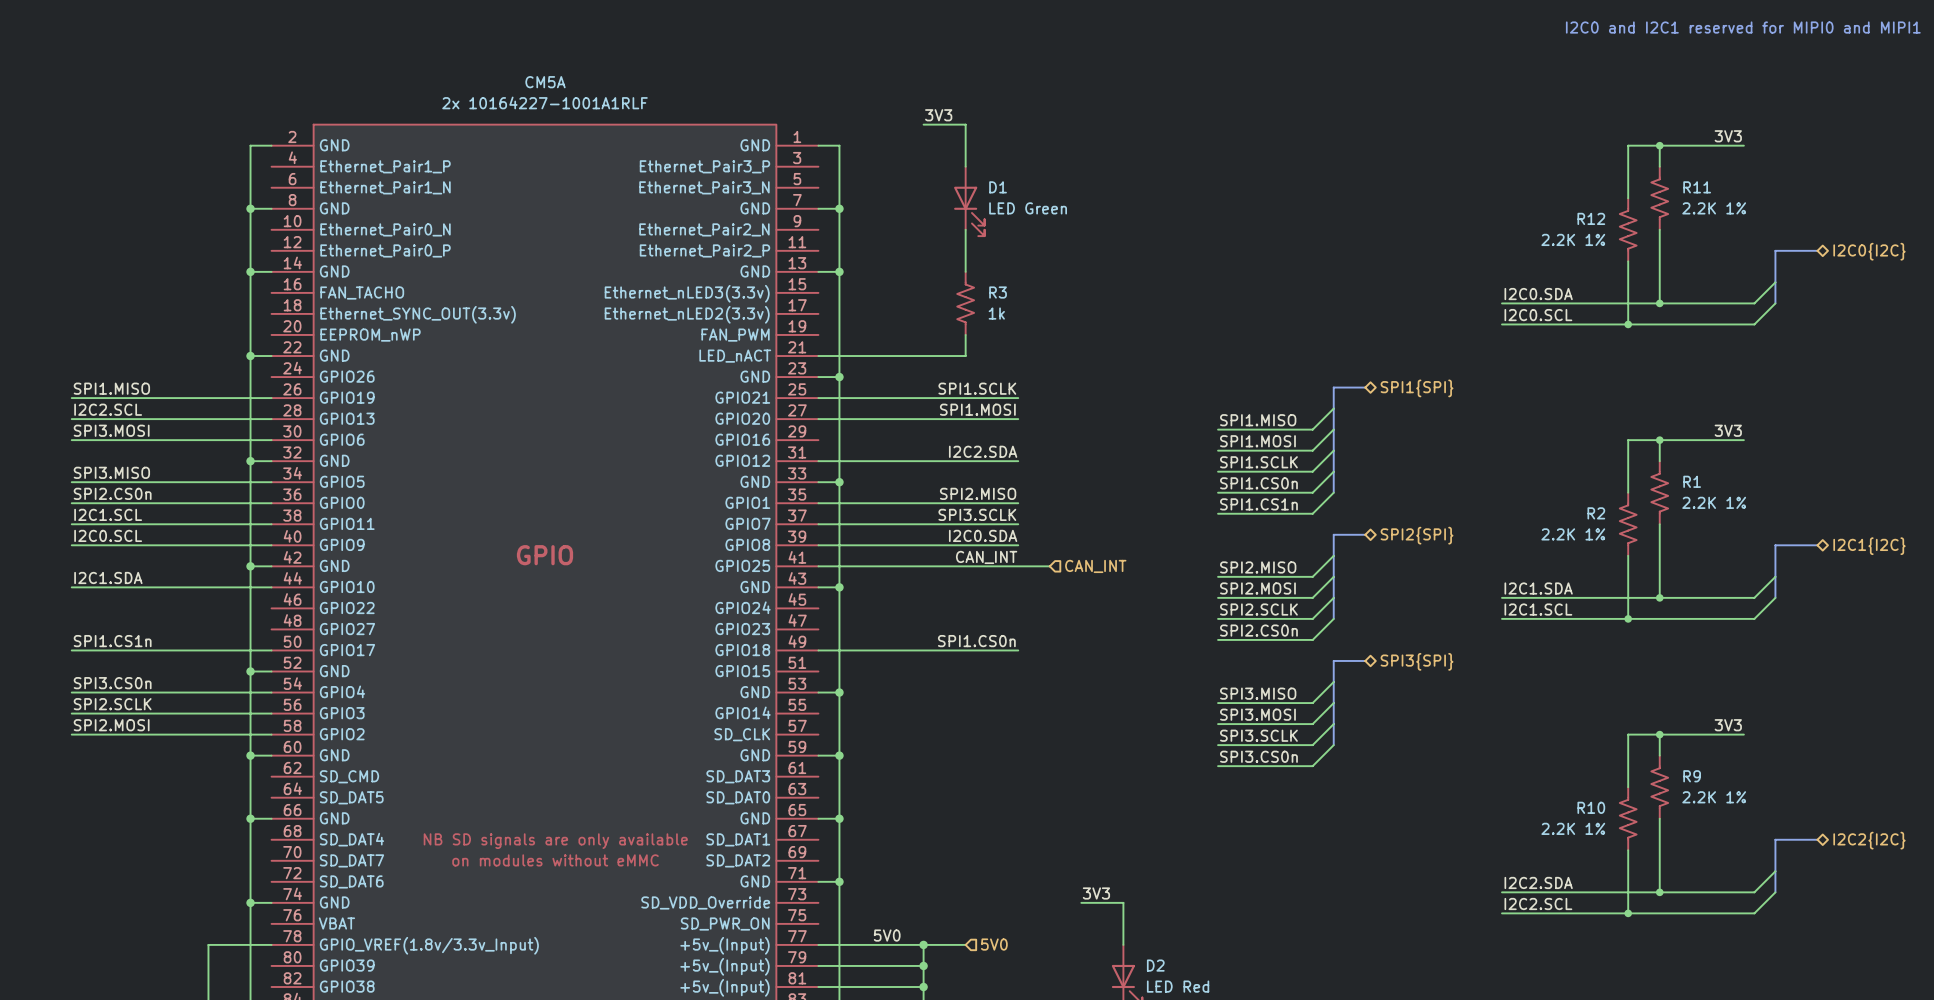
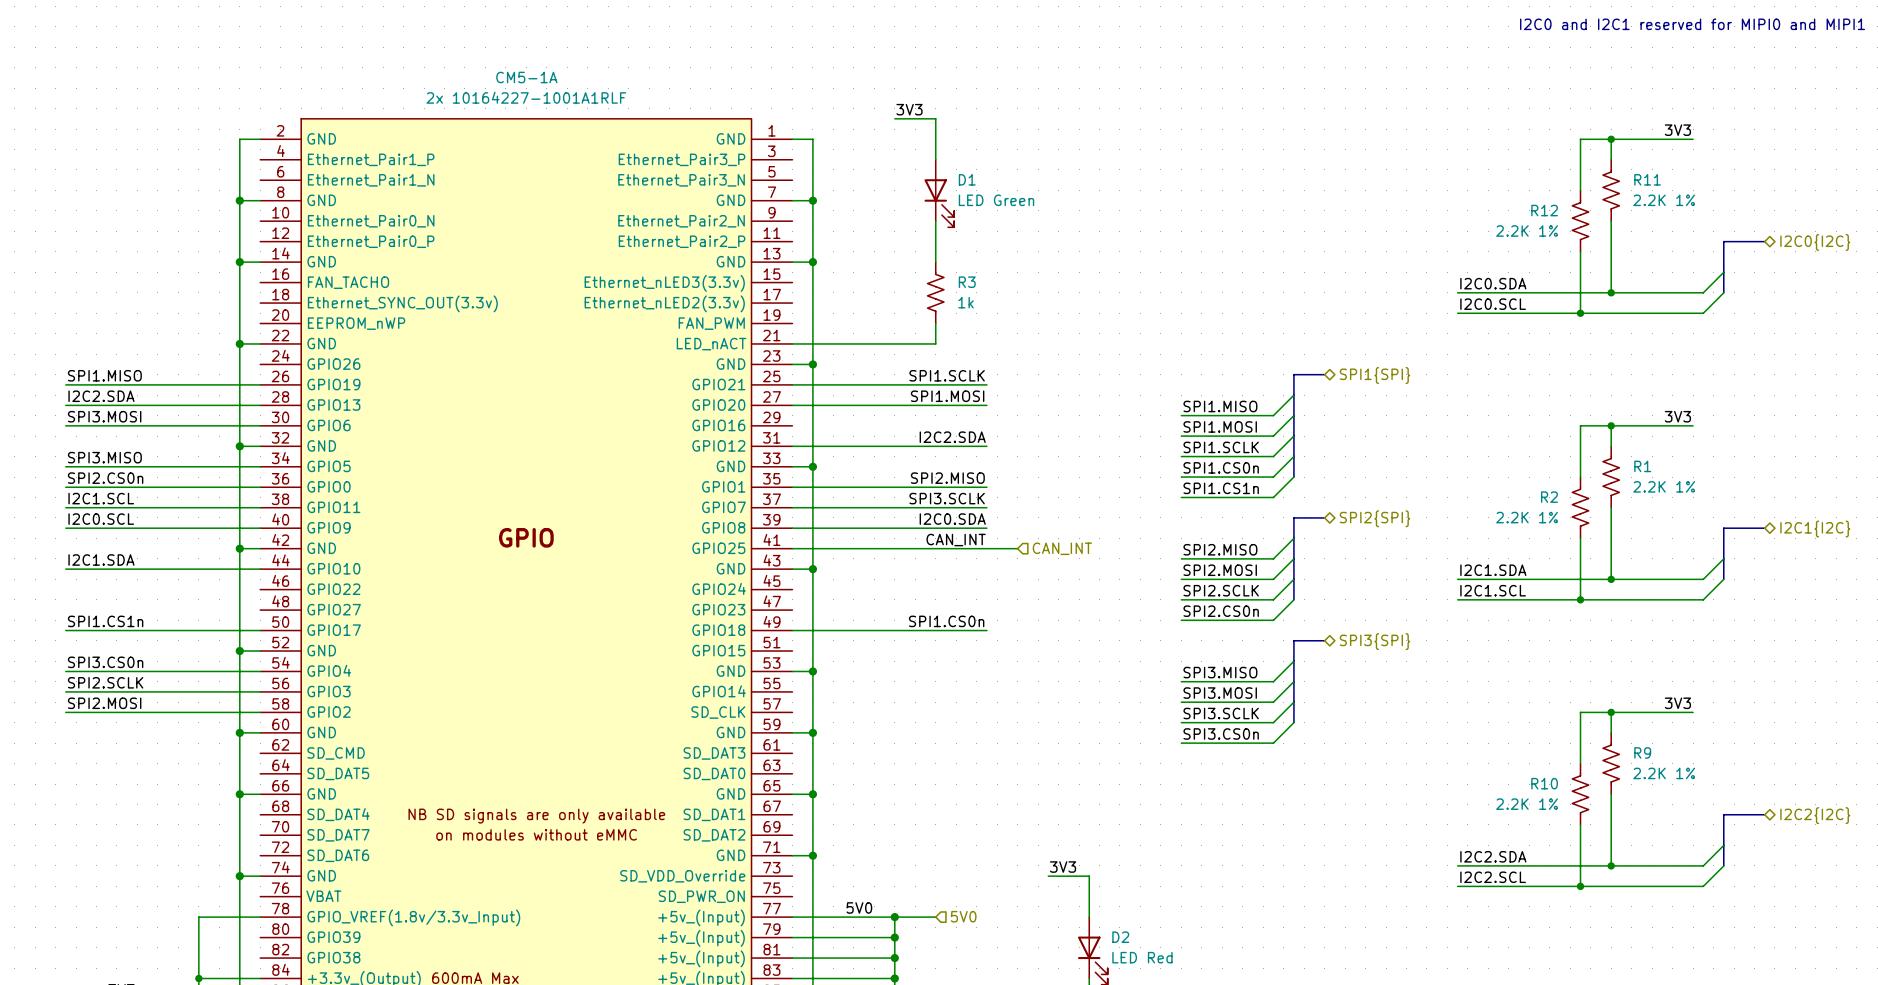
CM5A name: CM5A (545, 82) -> CM5-1A (526, 77)
label: I2C2.SCL (108, 409) -> I2C2.SDA (101, 396)

